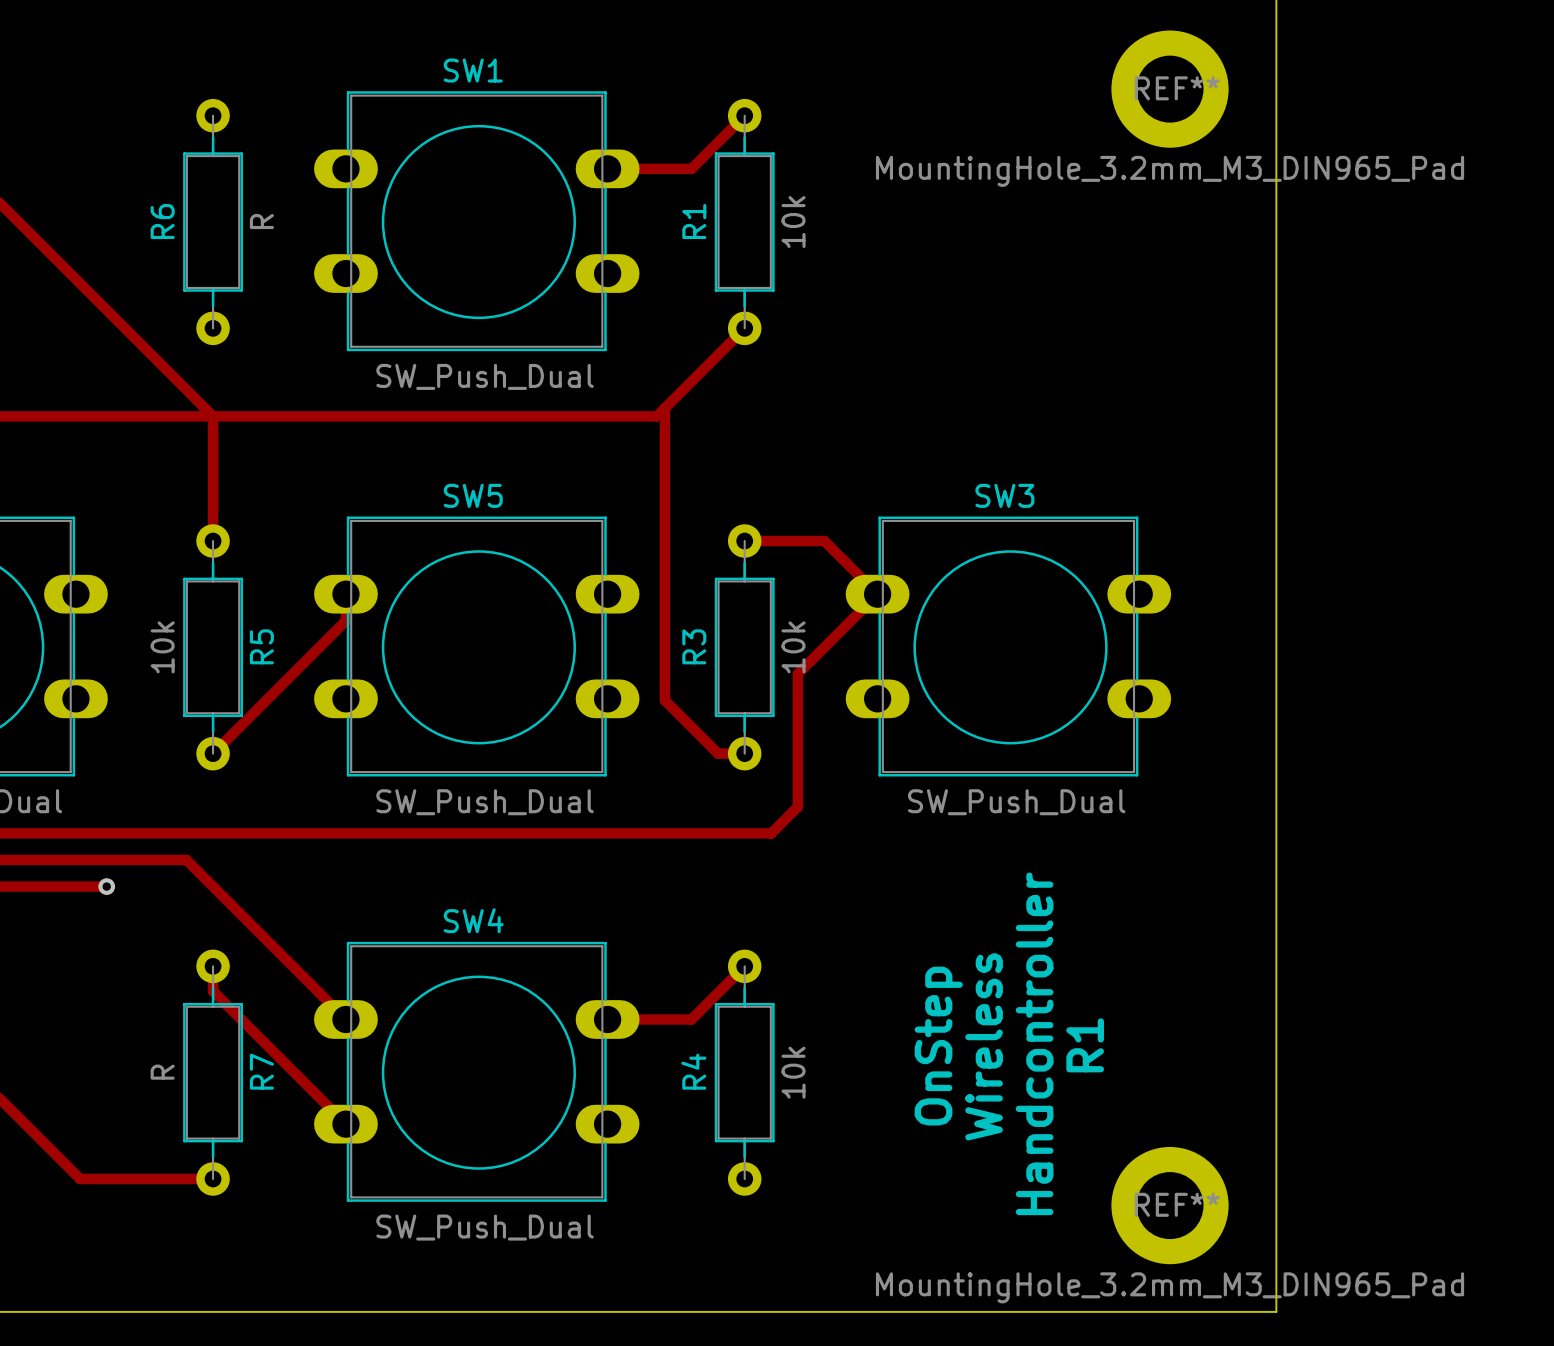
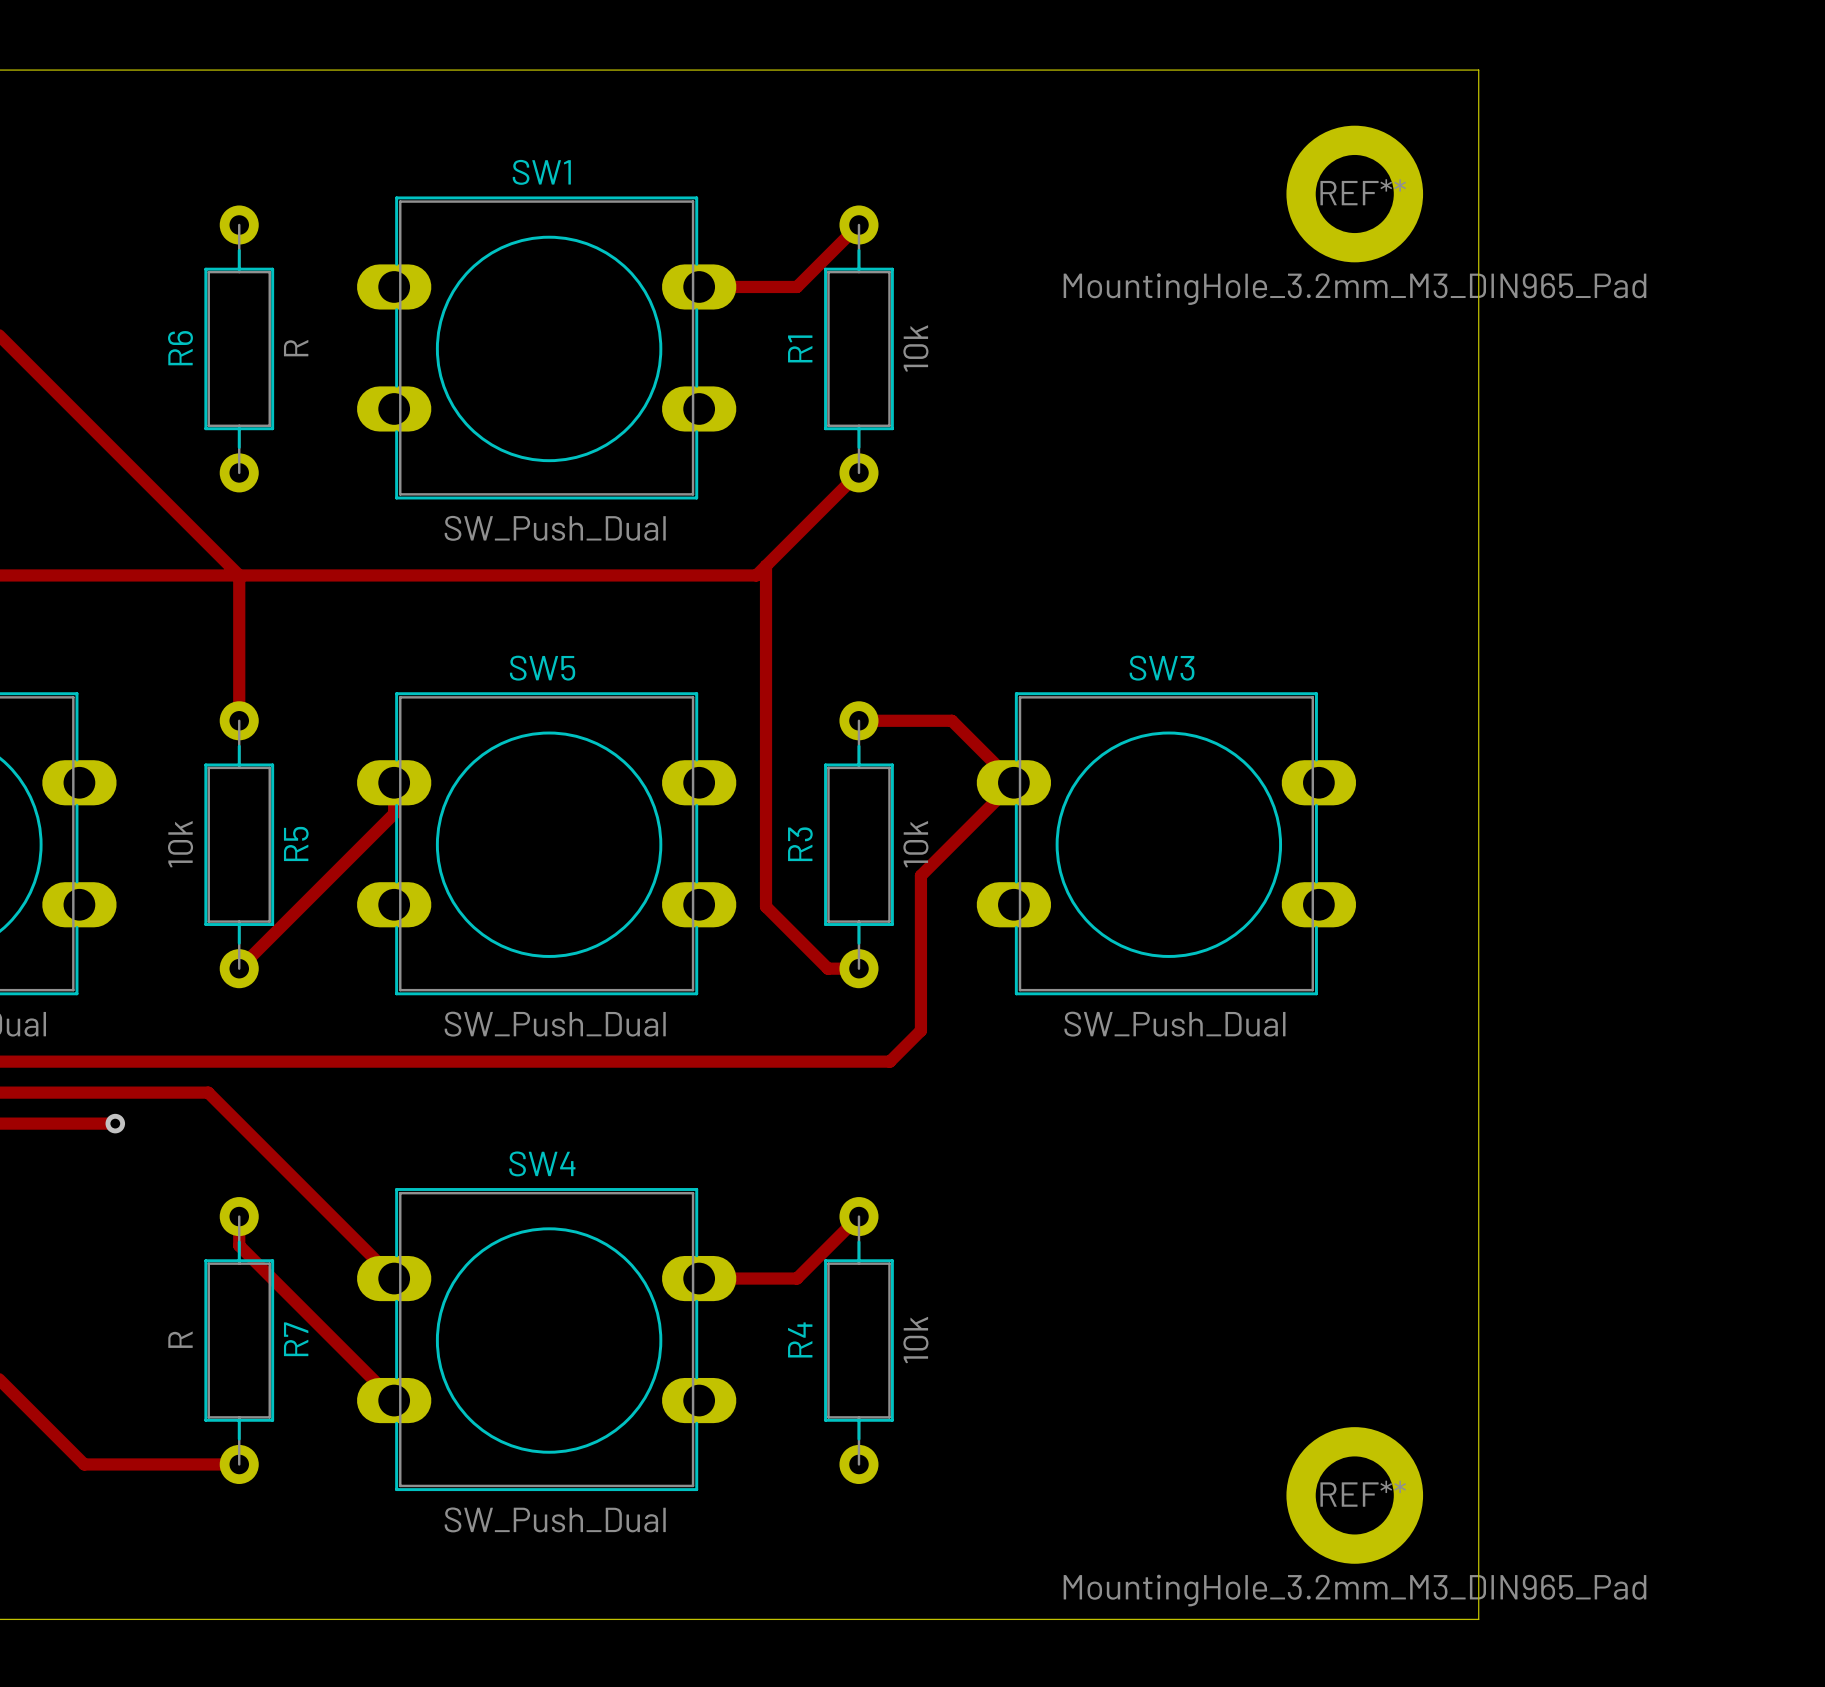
text: Handcontroller (1034, 1043) -> none
text: R1 (1085, 1045) -> none
text: OnStep (938, 1046) -> none
text: Wireless (984, 1046) -> none

